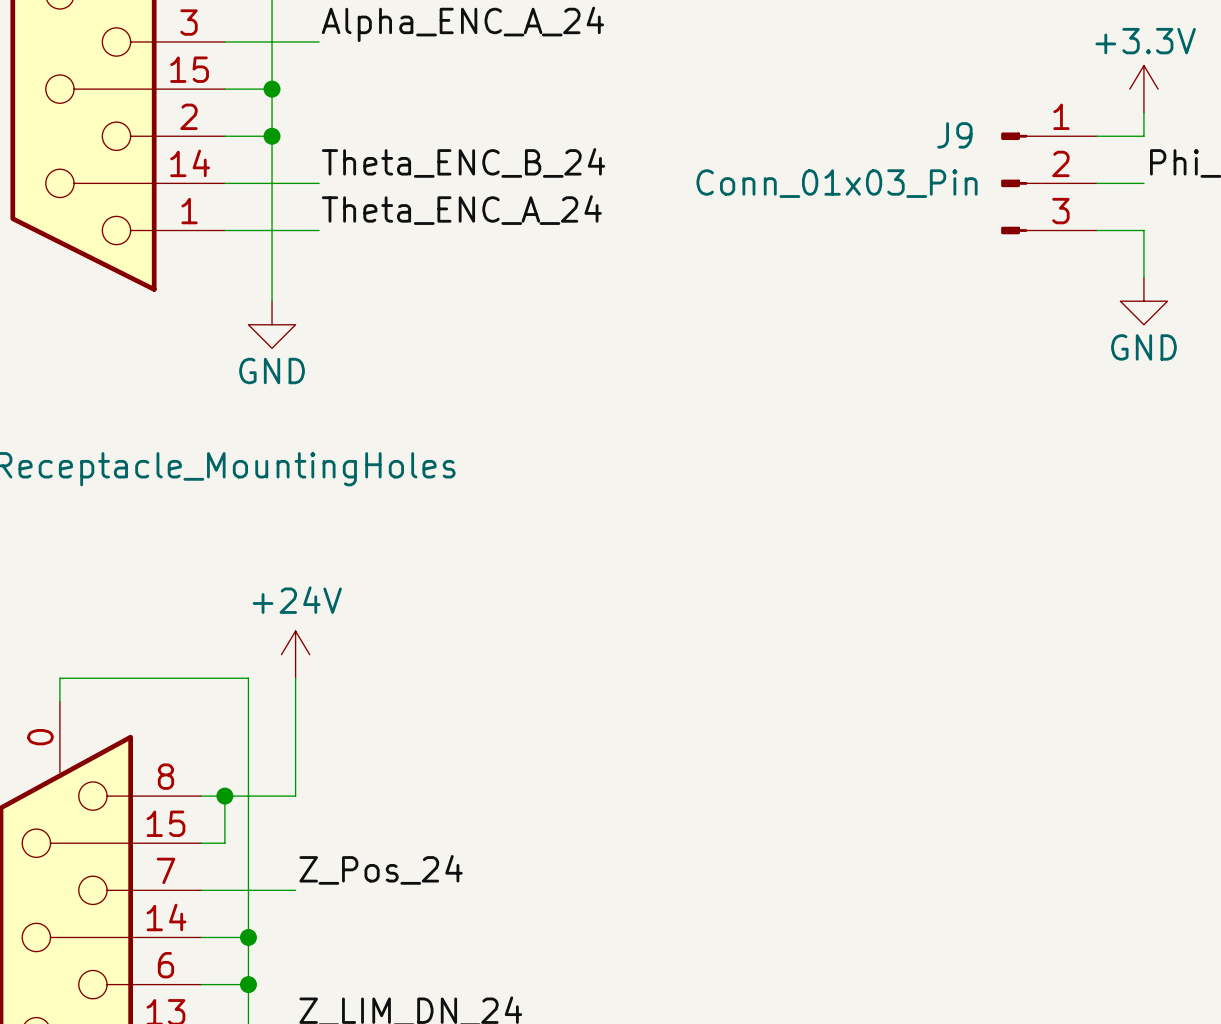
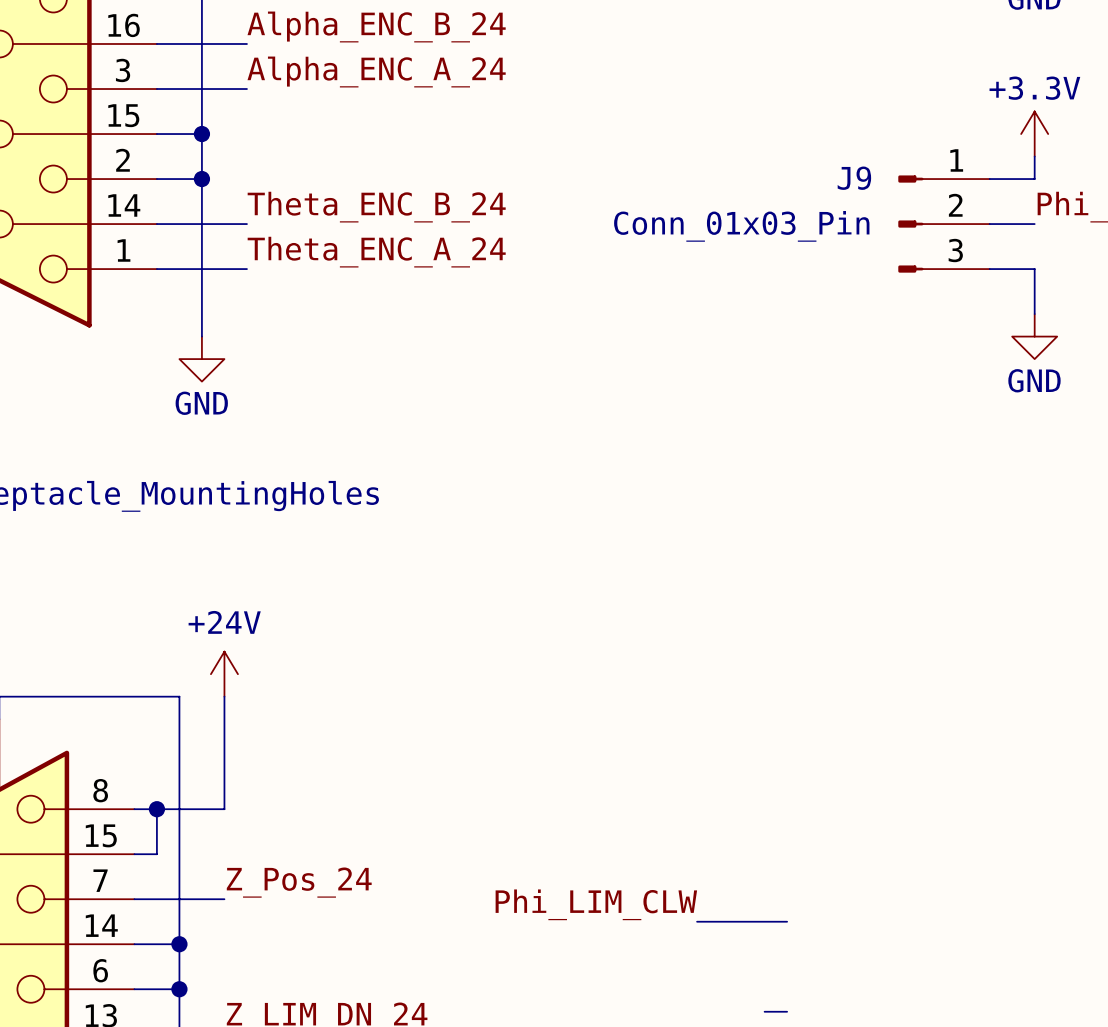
label: none -> Phi_LIM_CLW (596, 904)
wire: none -> (697, 921) (787, 921)
wire: none -> (764, 1011) (787, 1011)

